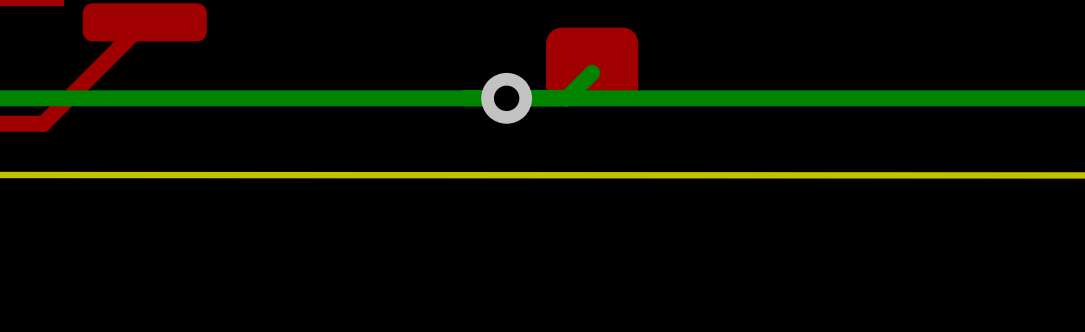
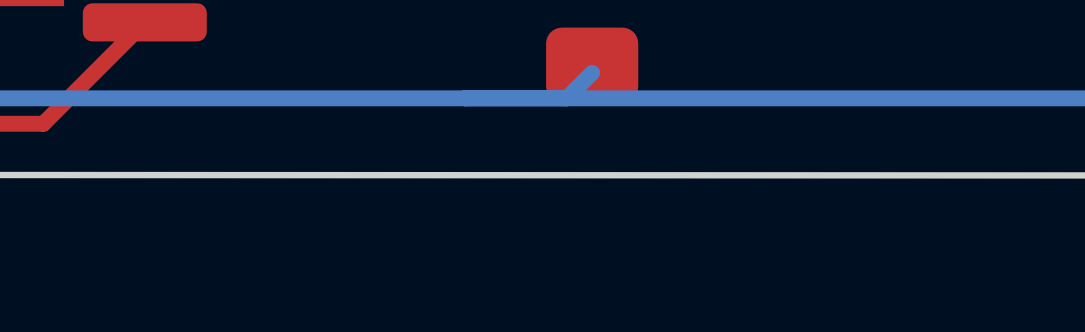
via: (506, 98) -> none

